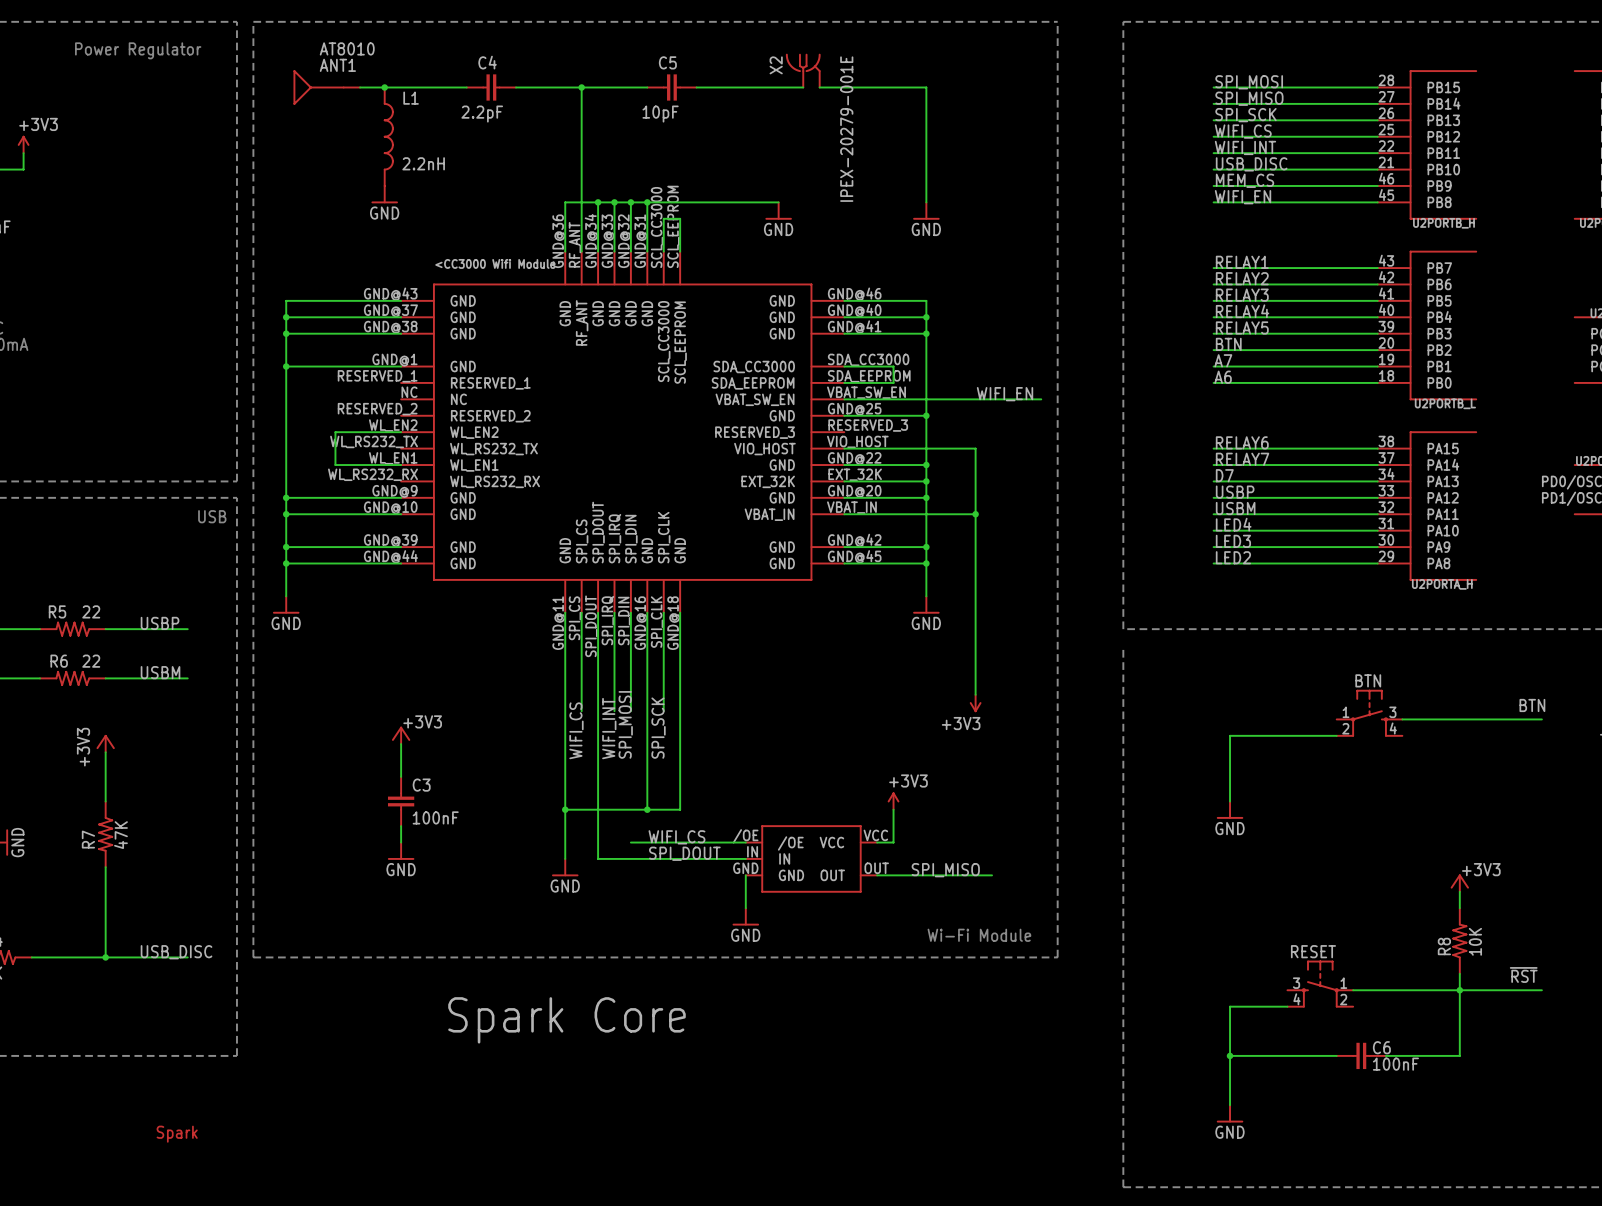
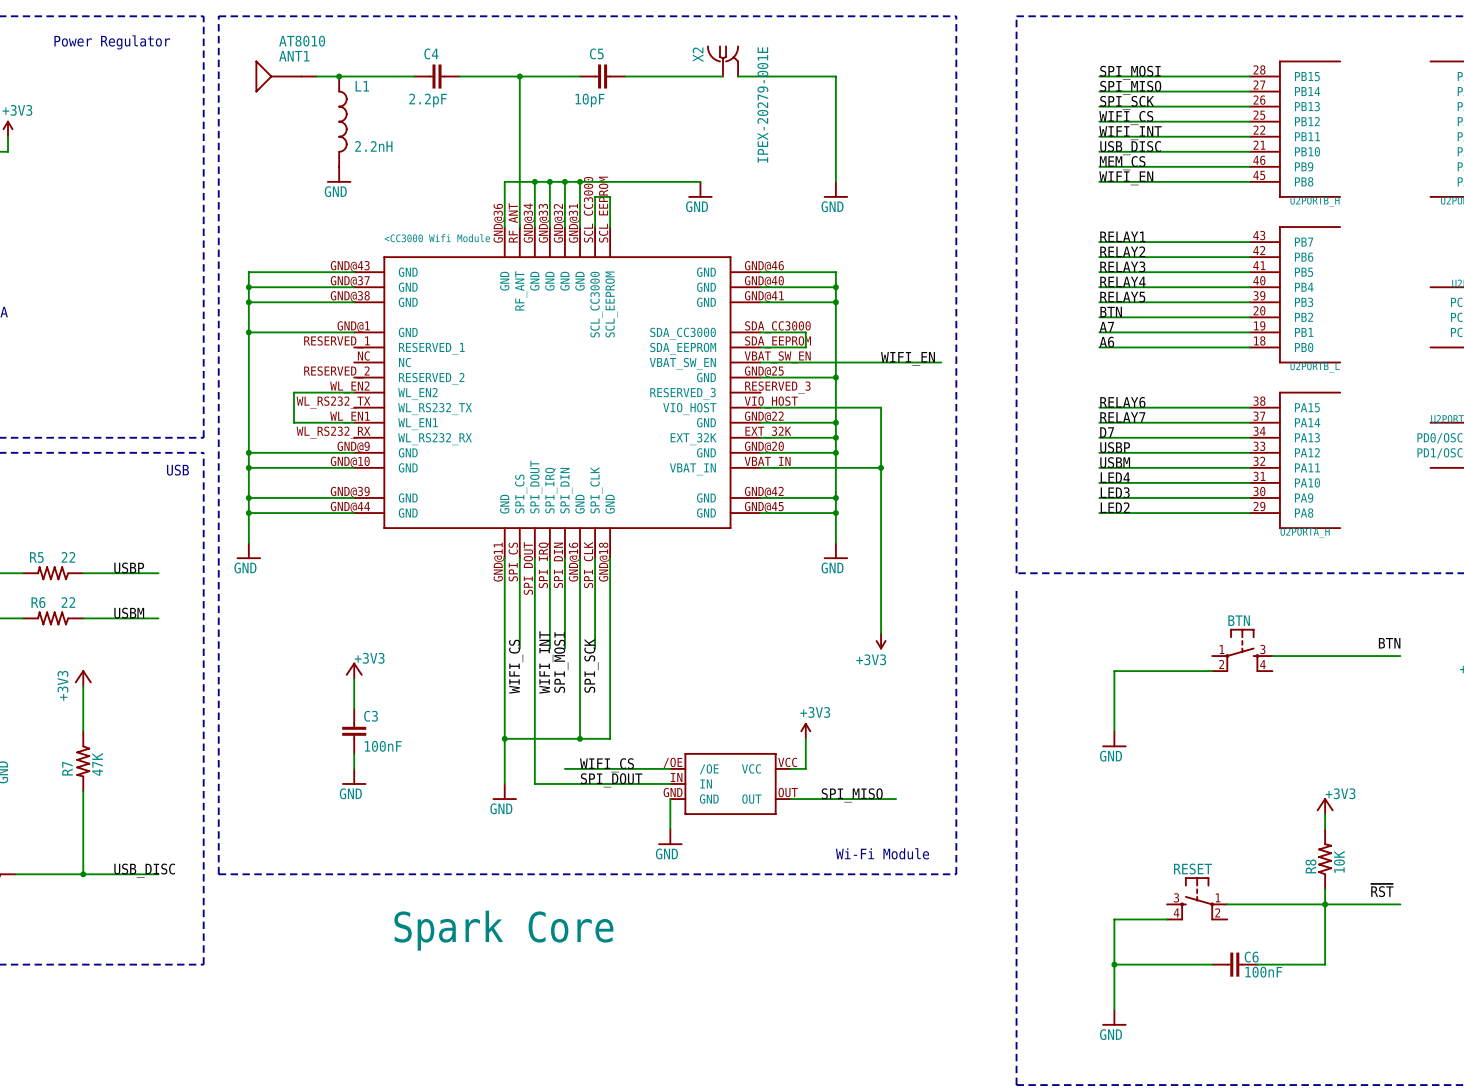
part: (177, 1134) -> none

